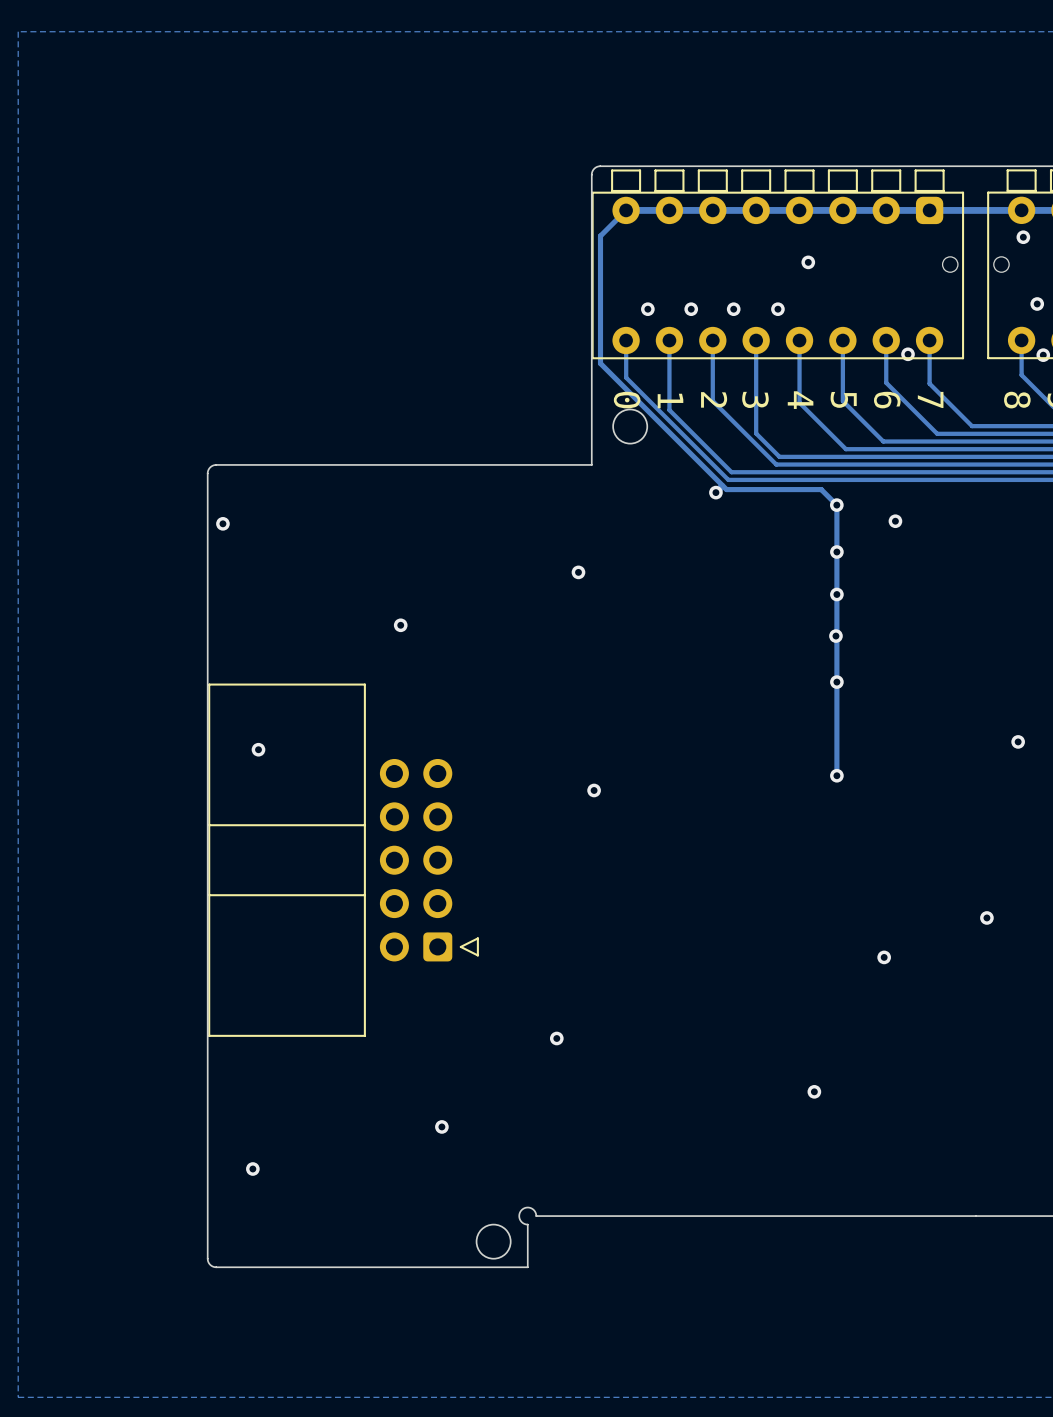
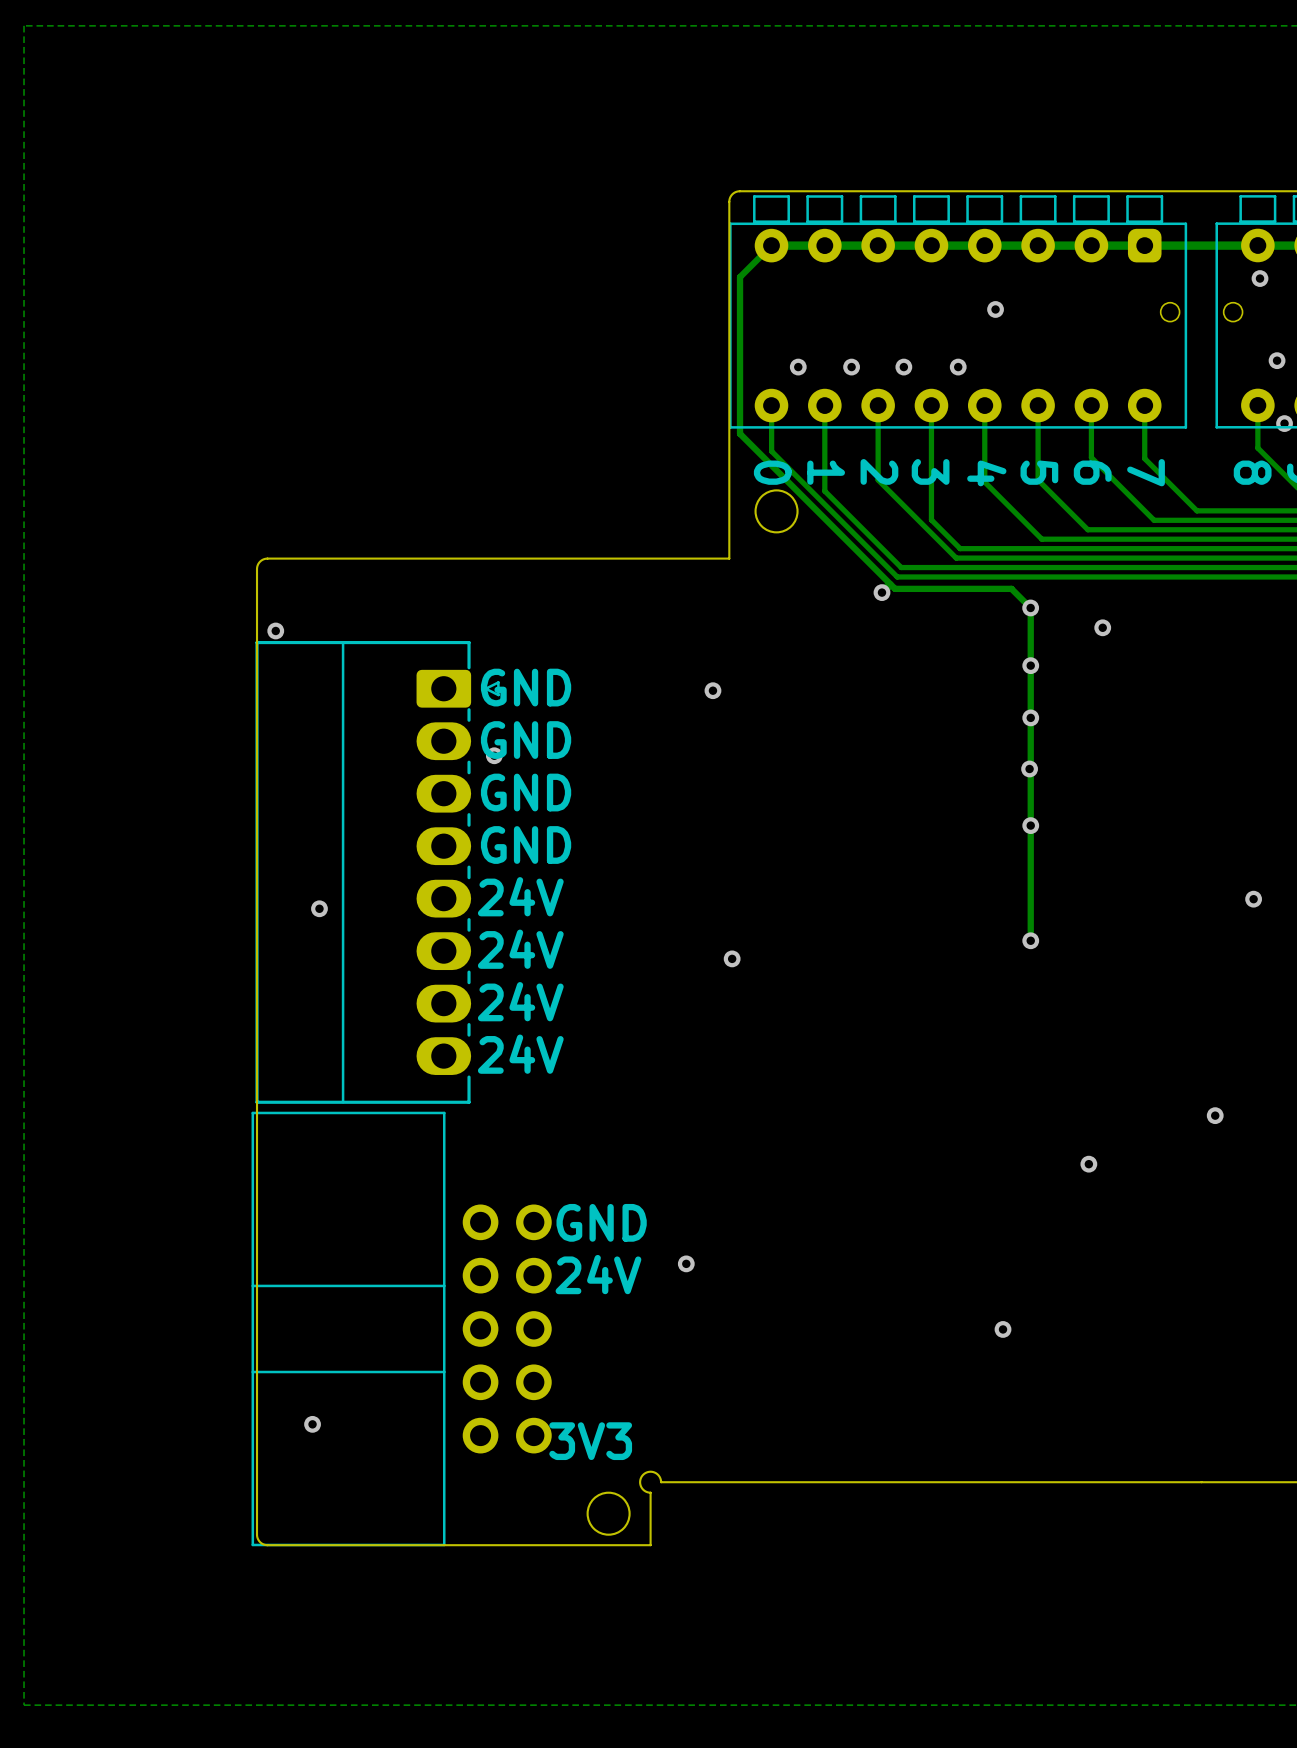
via: (908, 354) -> none
text: none -> GND (526, 687)
text: none -> GND (526, 740)
text: none -> GND (526, 792)
text: none -> GND (526, 845)
part: none -> (377, 872)
text: none -> 24V (520, 896)
text: none -> 24V (520, 949)
text: none -> 24V (520, 1001)
part: (343, 860) -> none
text: none -> 24V (520, 1054)
text: none -> GND (601, 1222)
text: none -> 24V (598, 1274)
part: none -> (401, 1328)
via: (441, 1126) -> none
text: none -> 3V3 (590, 1441)

